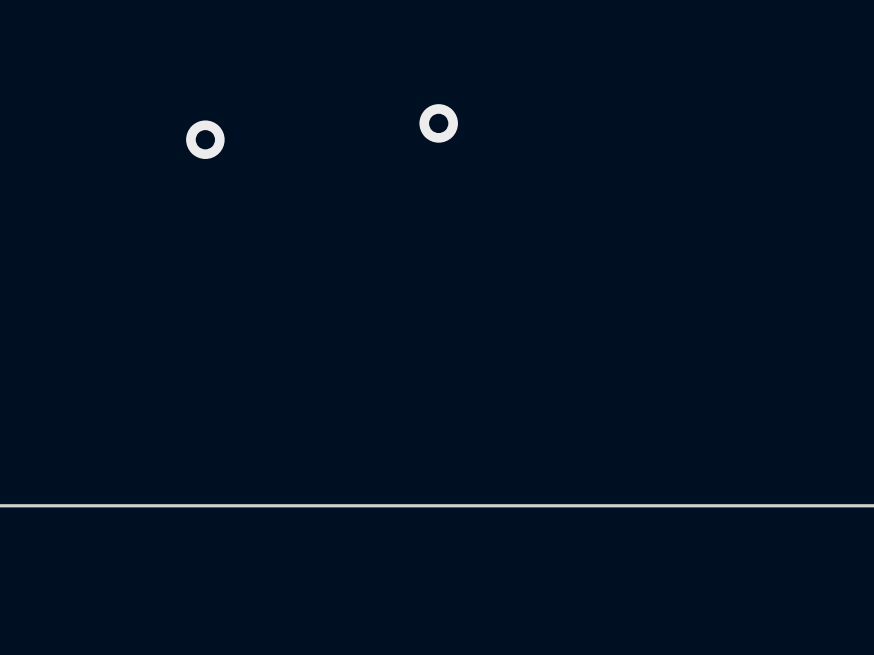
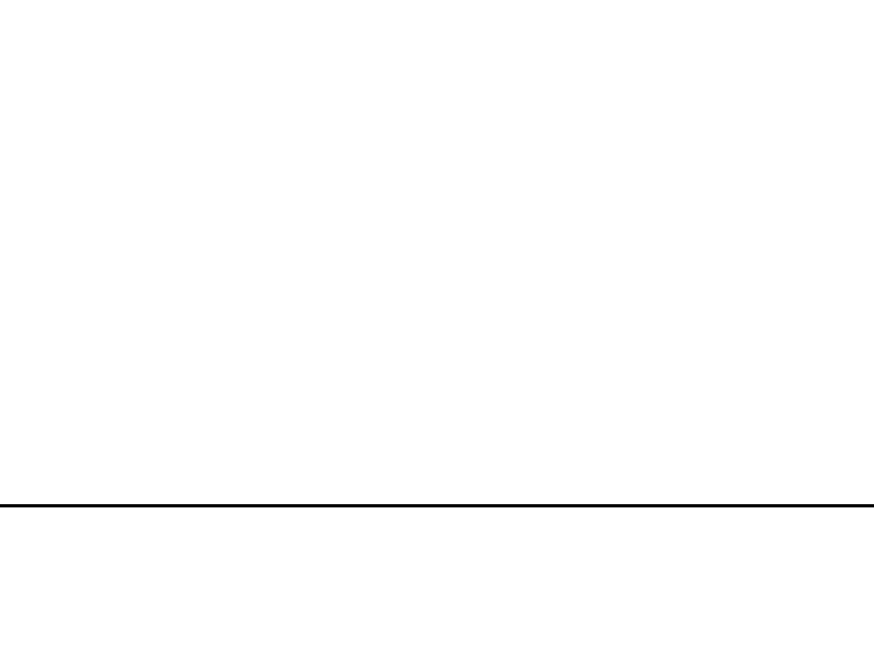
via: (438, 123) -> none
via: (205, 139) -> none

